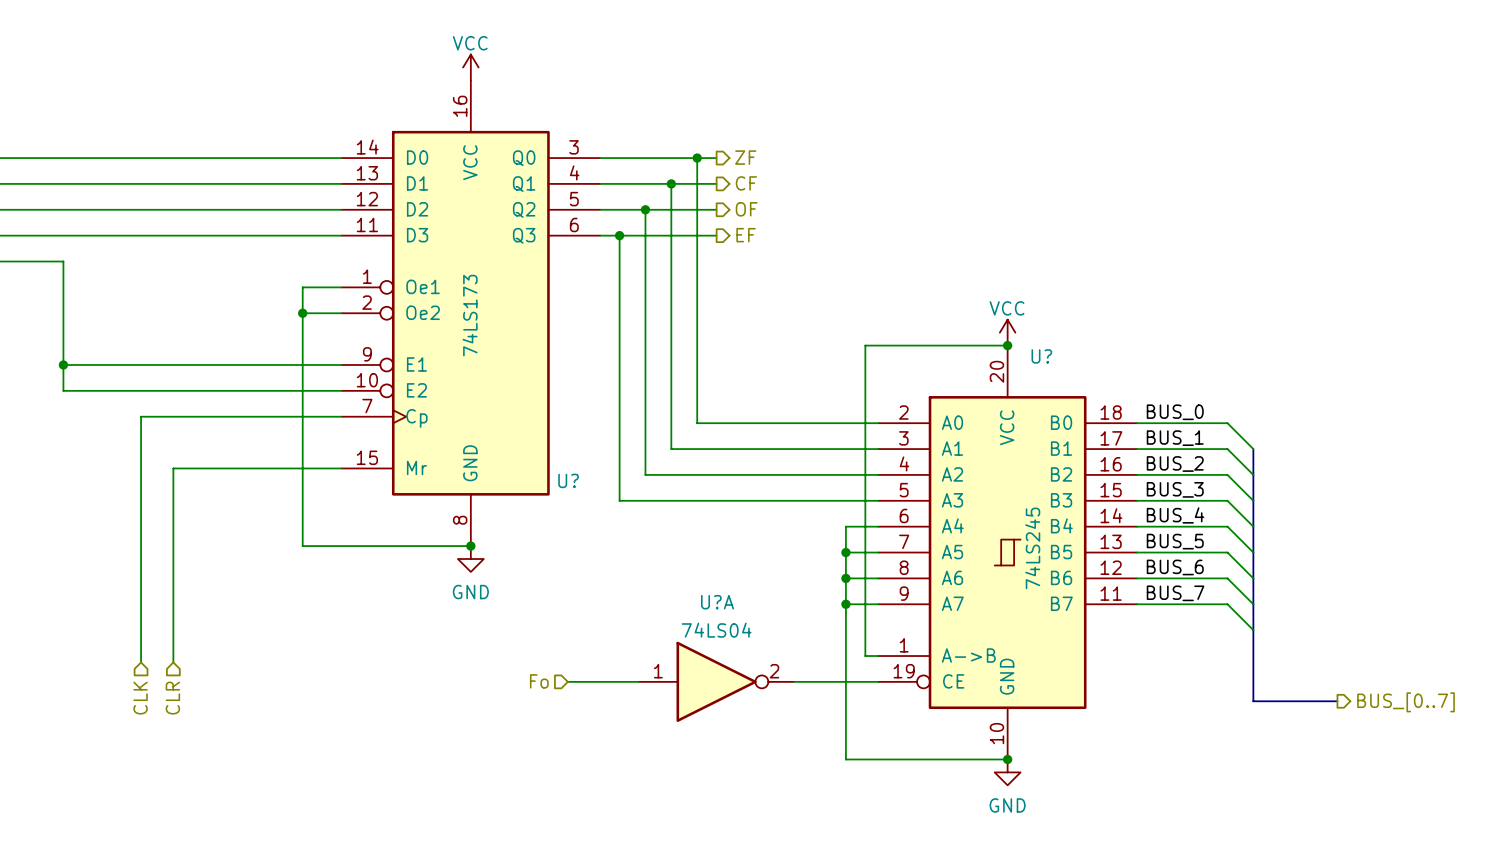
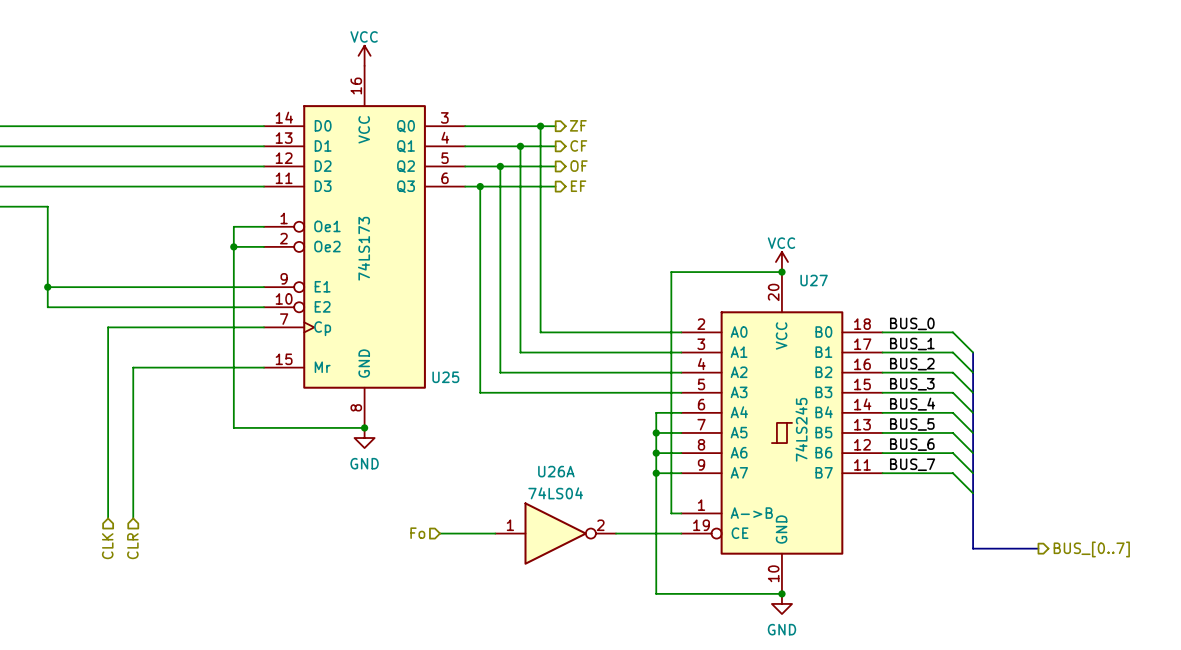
U? name: U? (1041, 356) -> U27 (814, 280)
U? name: U? (568, 480) -> U25 (445, 377)
U?A name: U?A (717, 602) -> U26A (556, 471)

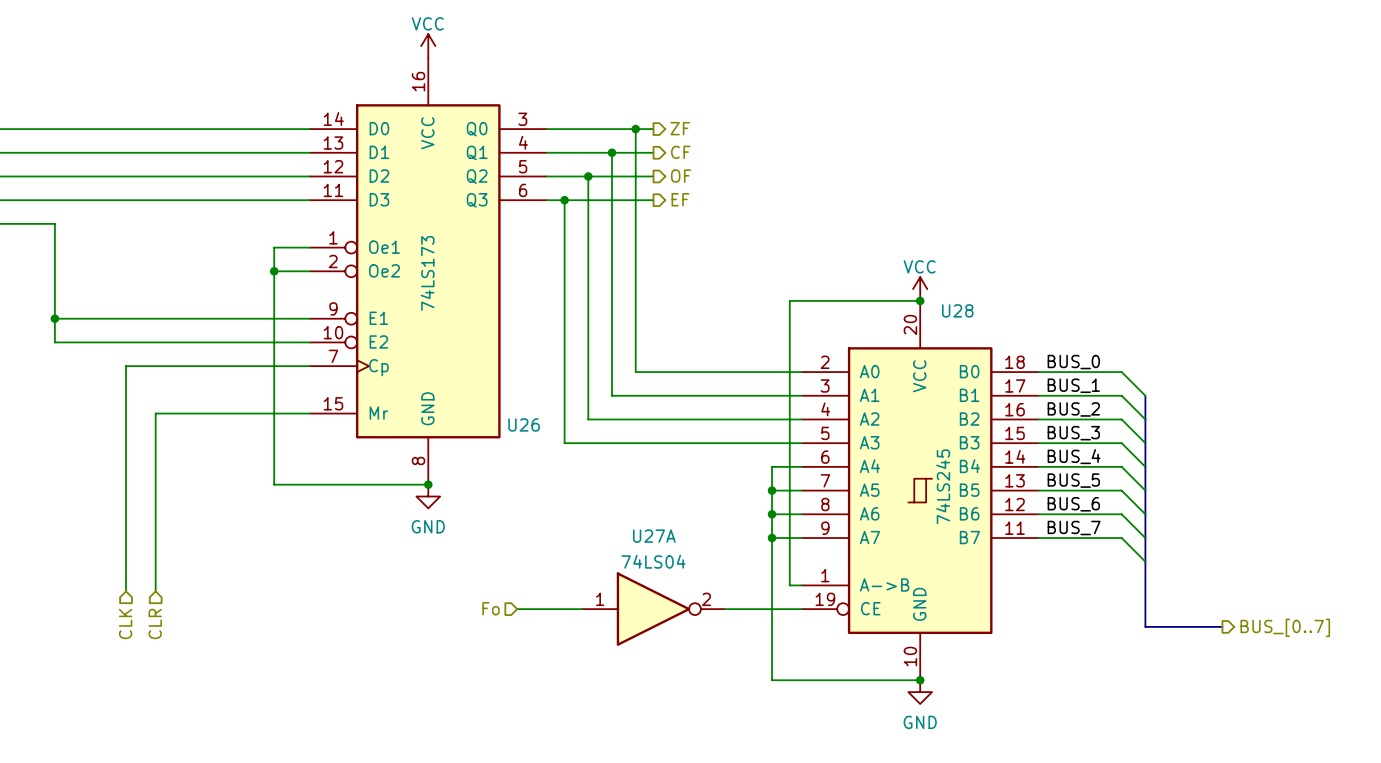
U27 name: U27 (814, 280) -> U28 (957, 310)
U25 name: U25 (445, 377) -> U26 (524, 424)
U26A name: U26A (556, 471) -> U27A (654, 536)

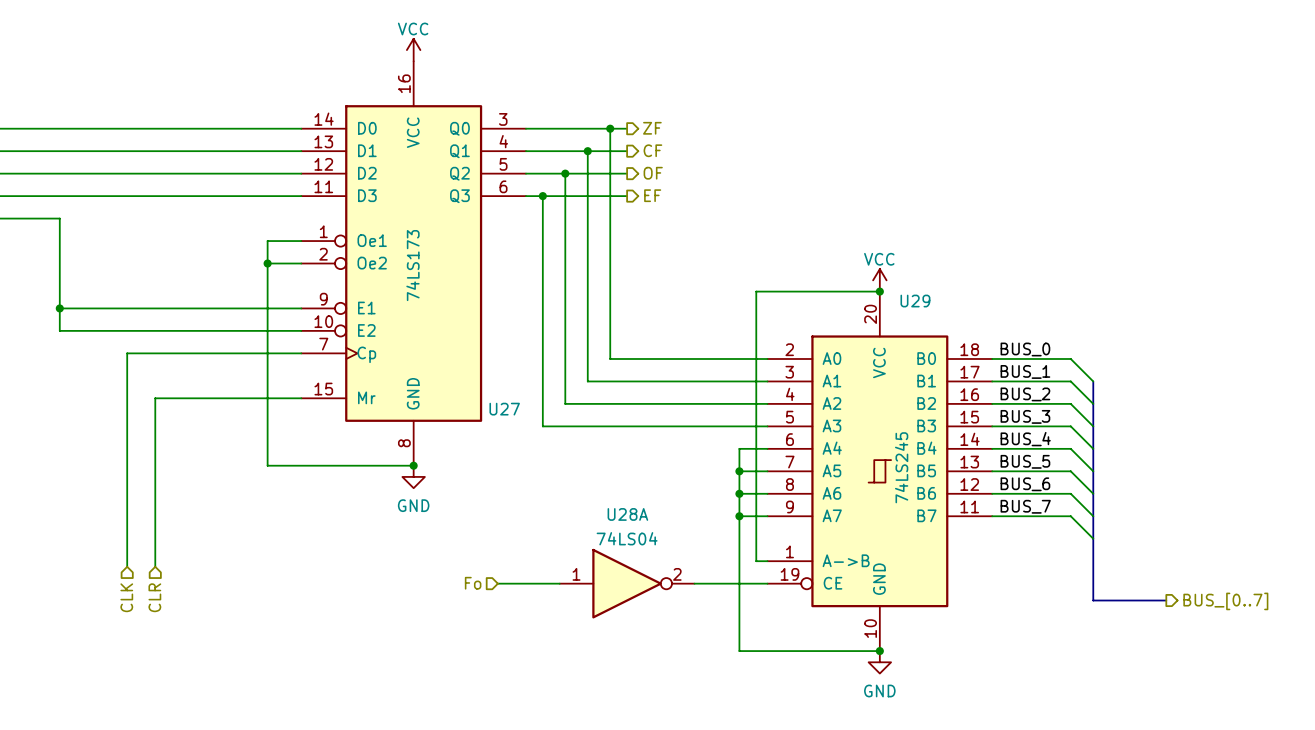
U28 name: U28 (957, 310) -> U29 (915, 301)
U26 name: U26 (524, 424) -> U27 (504, 409)
U27A name: U27A (654, 536) -> U28A (627, 514)

